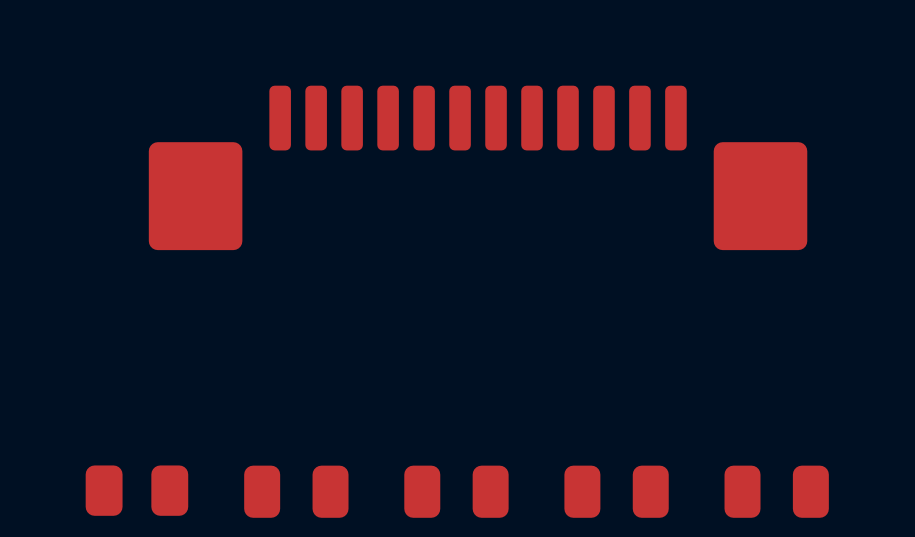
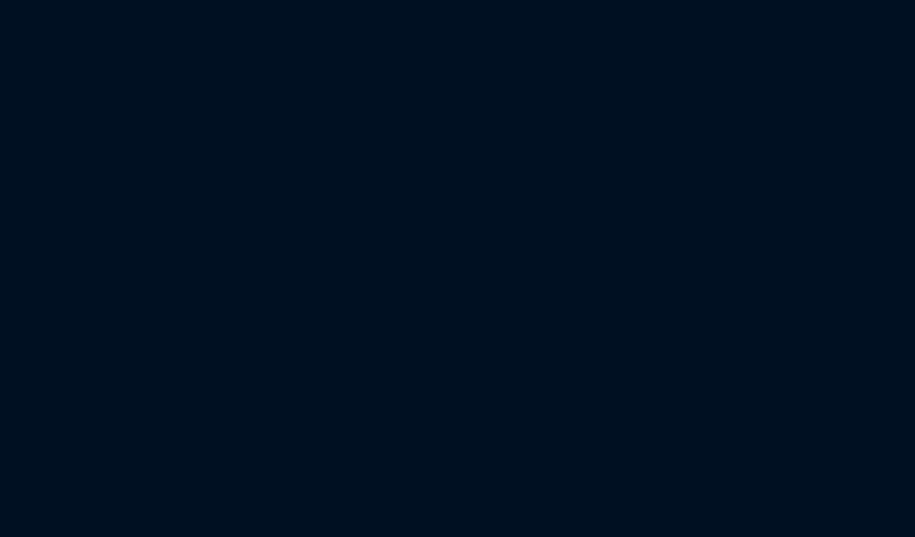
part: (478, 167) -> none
part: (136, 490) -> none
part: (296, 491) -> none
part: (456, 491) -> none
part: (616, 491) -> none
part: (776, 491) -> none

